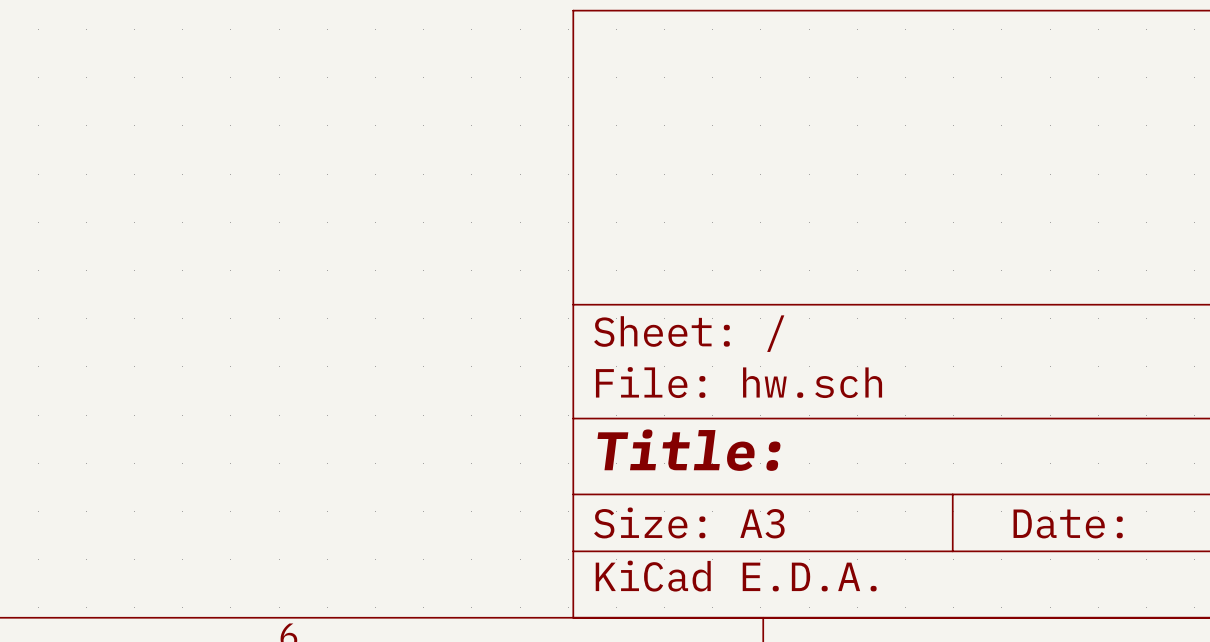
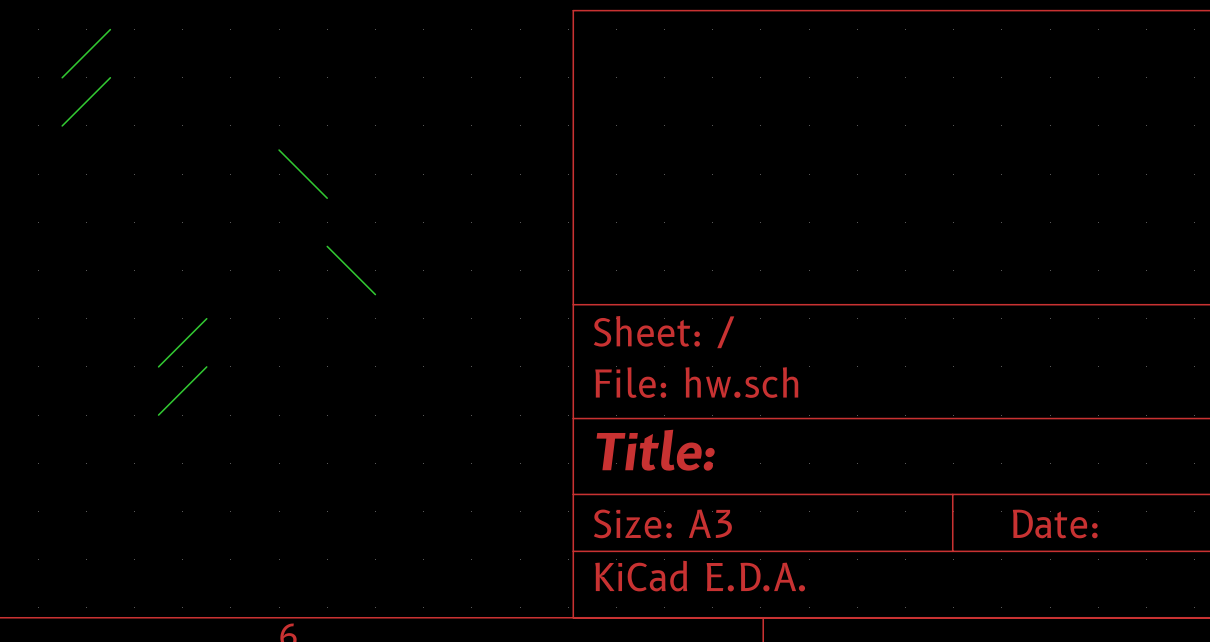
wire: none -> (110, 29) (62, 77)
wire: none -> (110, 77) (62, 125)
wire: none -> (279, 150) (327, 198)
wire: none -> (327, 246) (375, 294)
wire: none -> (206, 318) (158, 366)
wire: none -> (206, 366) (158, 415)

